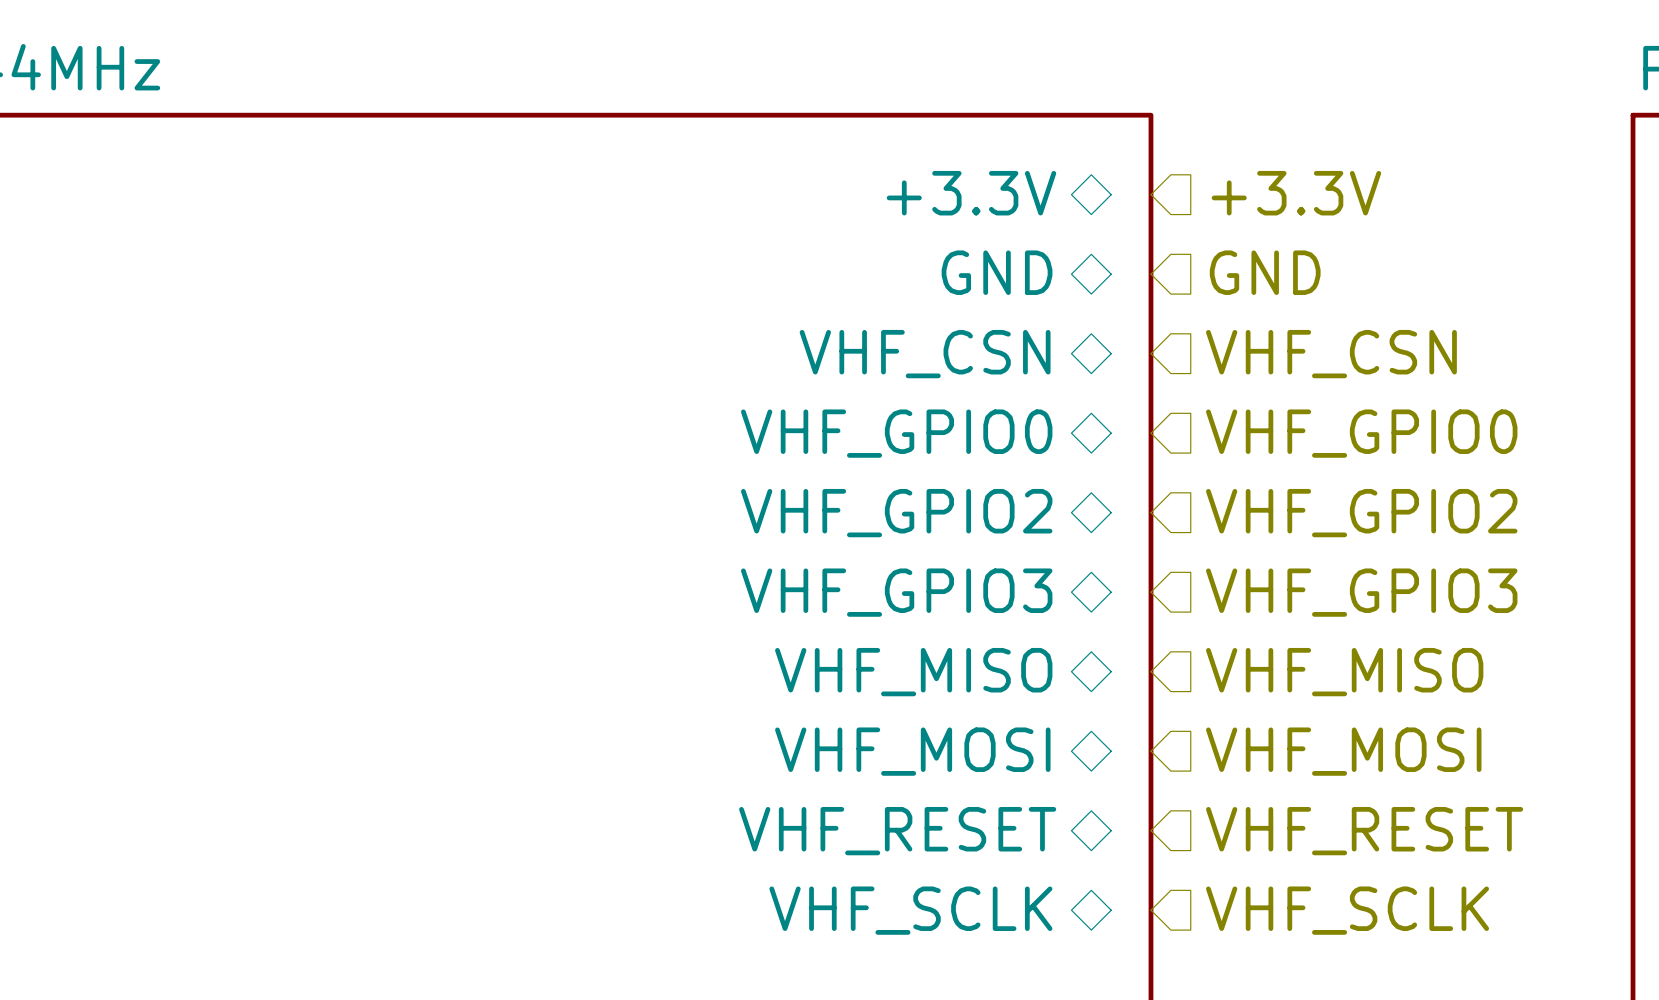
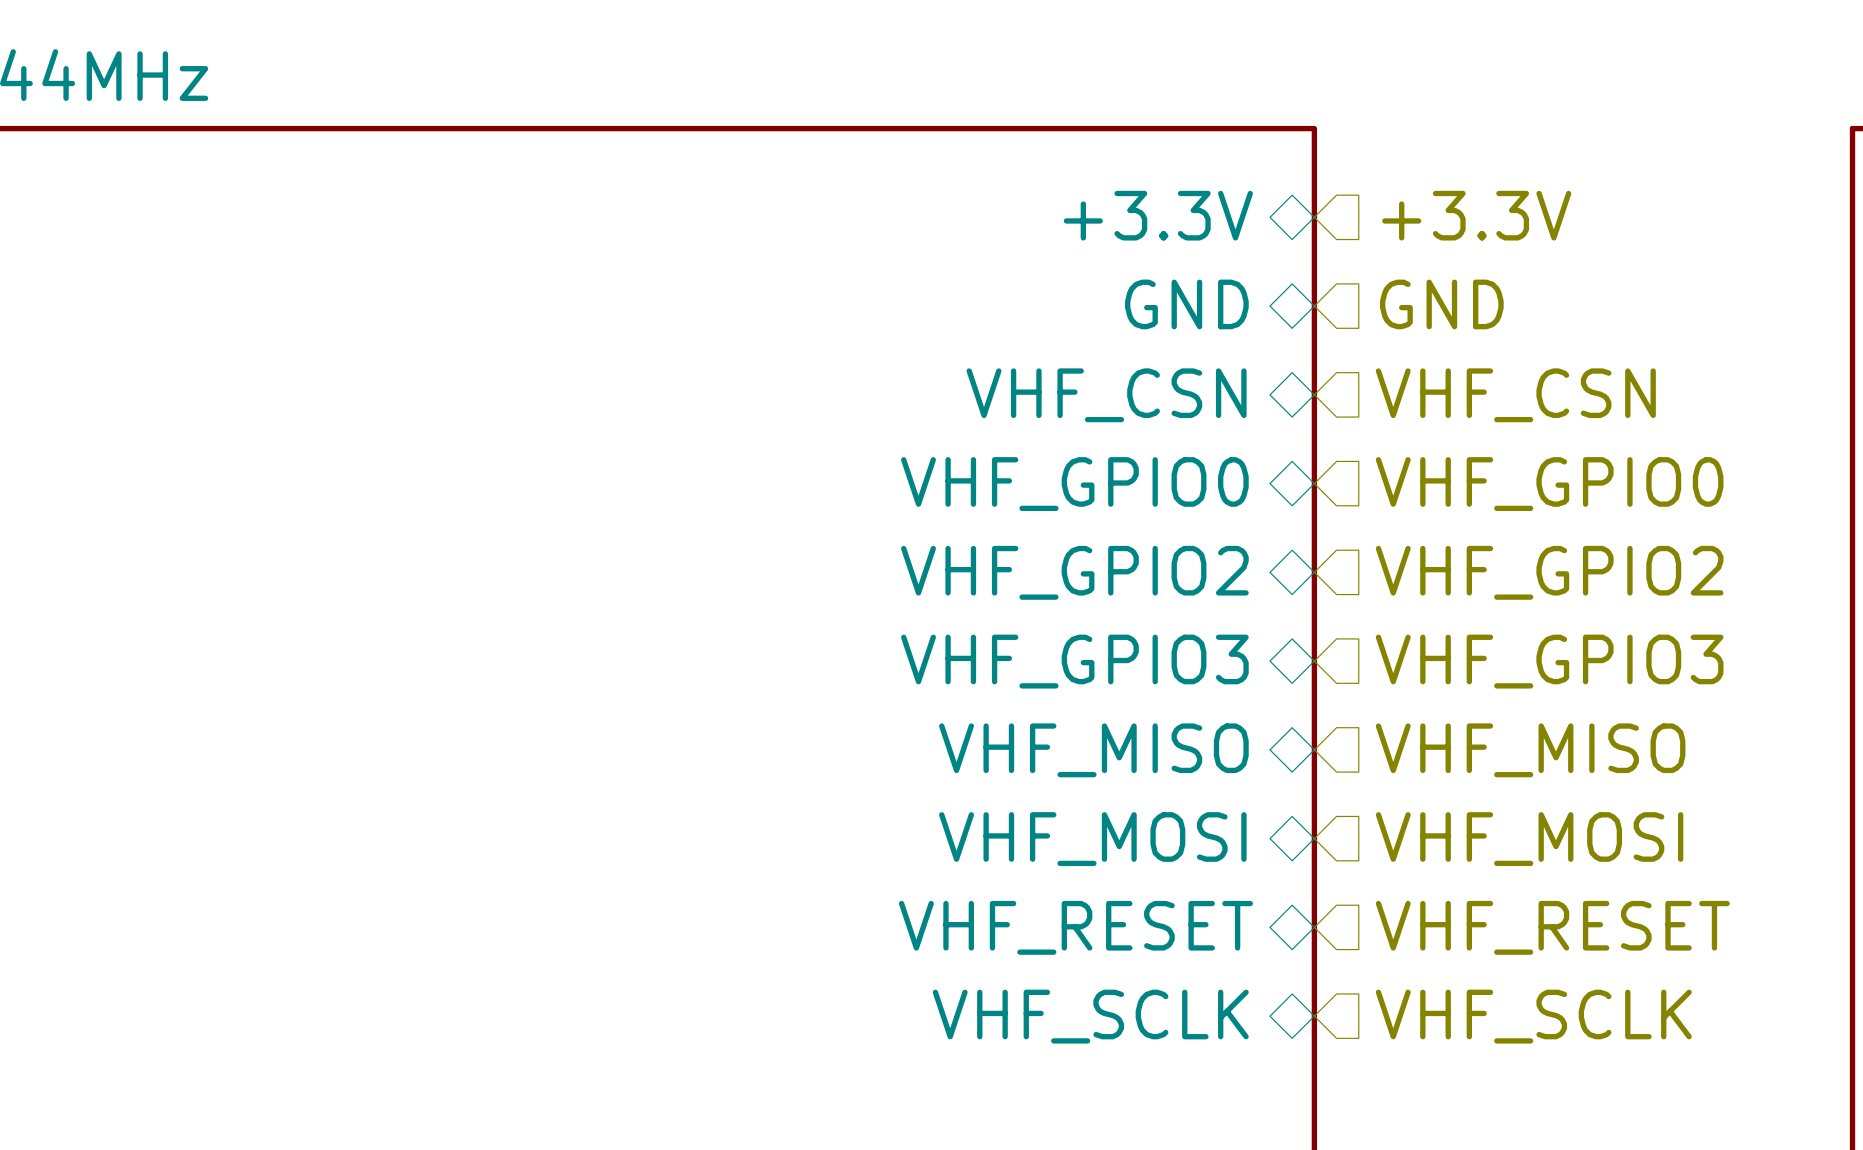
sheet pin position: +3.3V (971, 193) -> +3.3V (1158, 215)
sheet pin position: GND (997, 272) -> GND (1186, 304)
sheet pin position: VHF_CSN (925, 354) -> VHF_CSN (1106, 395)
sheet pin position: VHF_GPIO0 (896, 433) -> VHF_GPIO0 (1074, 484)
sheet pin position: VHF_GPIO2 (896, 513) -> VHF_GPIO2 (1074, 572)
sheet pin position: VHF_GPIO3 (896, 592) -> VHF_GPIO3 (1074, 661)
sheet pin position: VHF_MISO (913, 672) -> VHF_MISO (1093, 750)
sheet pin position: VHF_MOSI (912, 751) -> VHF_MOSI (1092, 839)
sheet pin position: VHF_RESET (897, 831) -> VHF_RESET (1075, 927)
sheet pin position: VHF_SCLK (910, 910) -> VHF_SCLK (1090, 1016)

